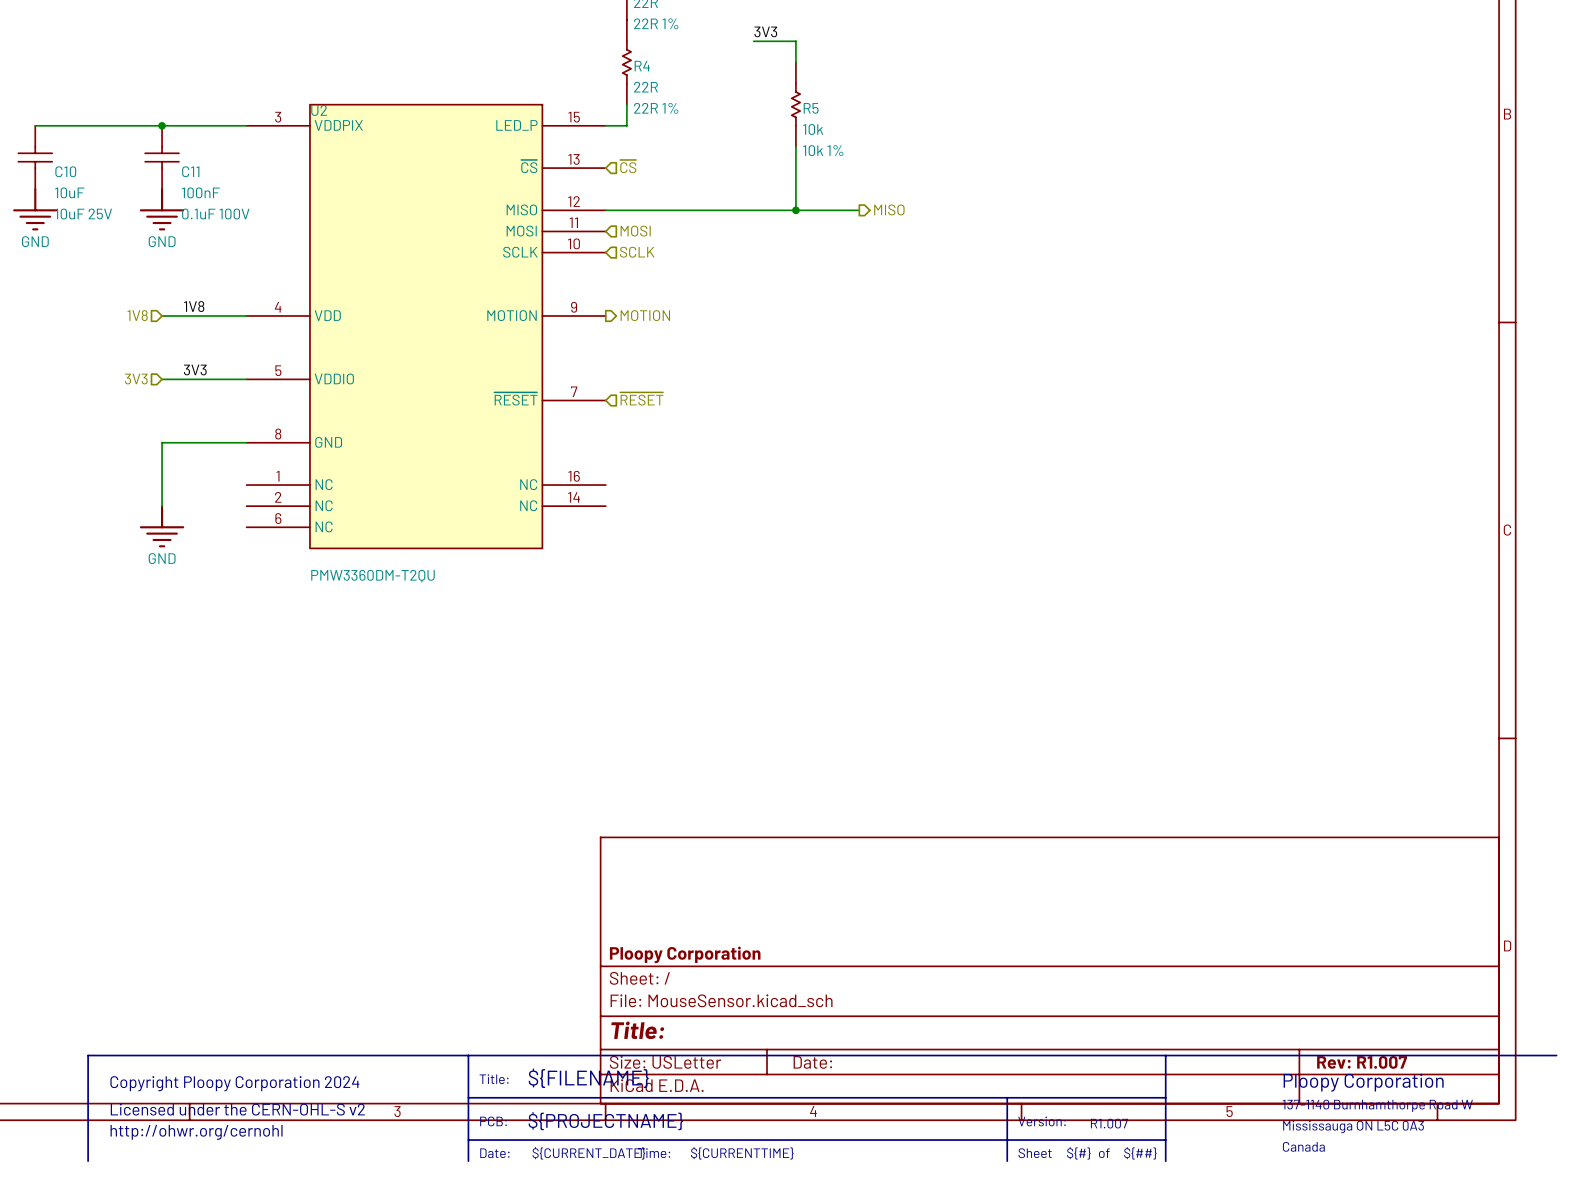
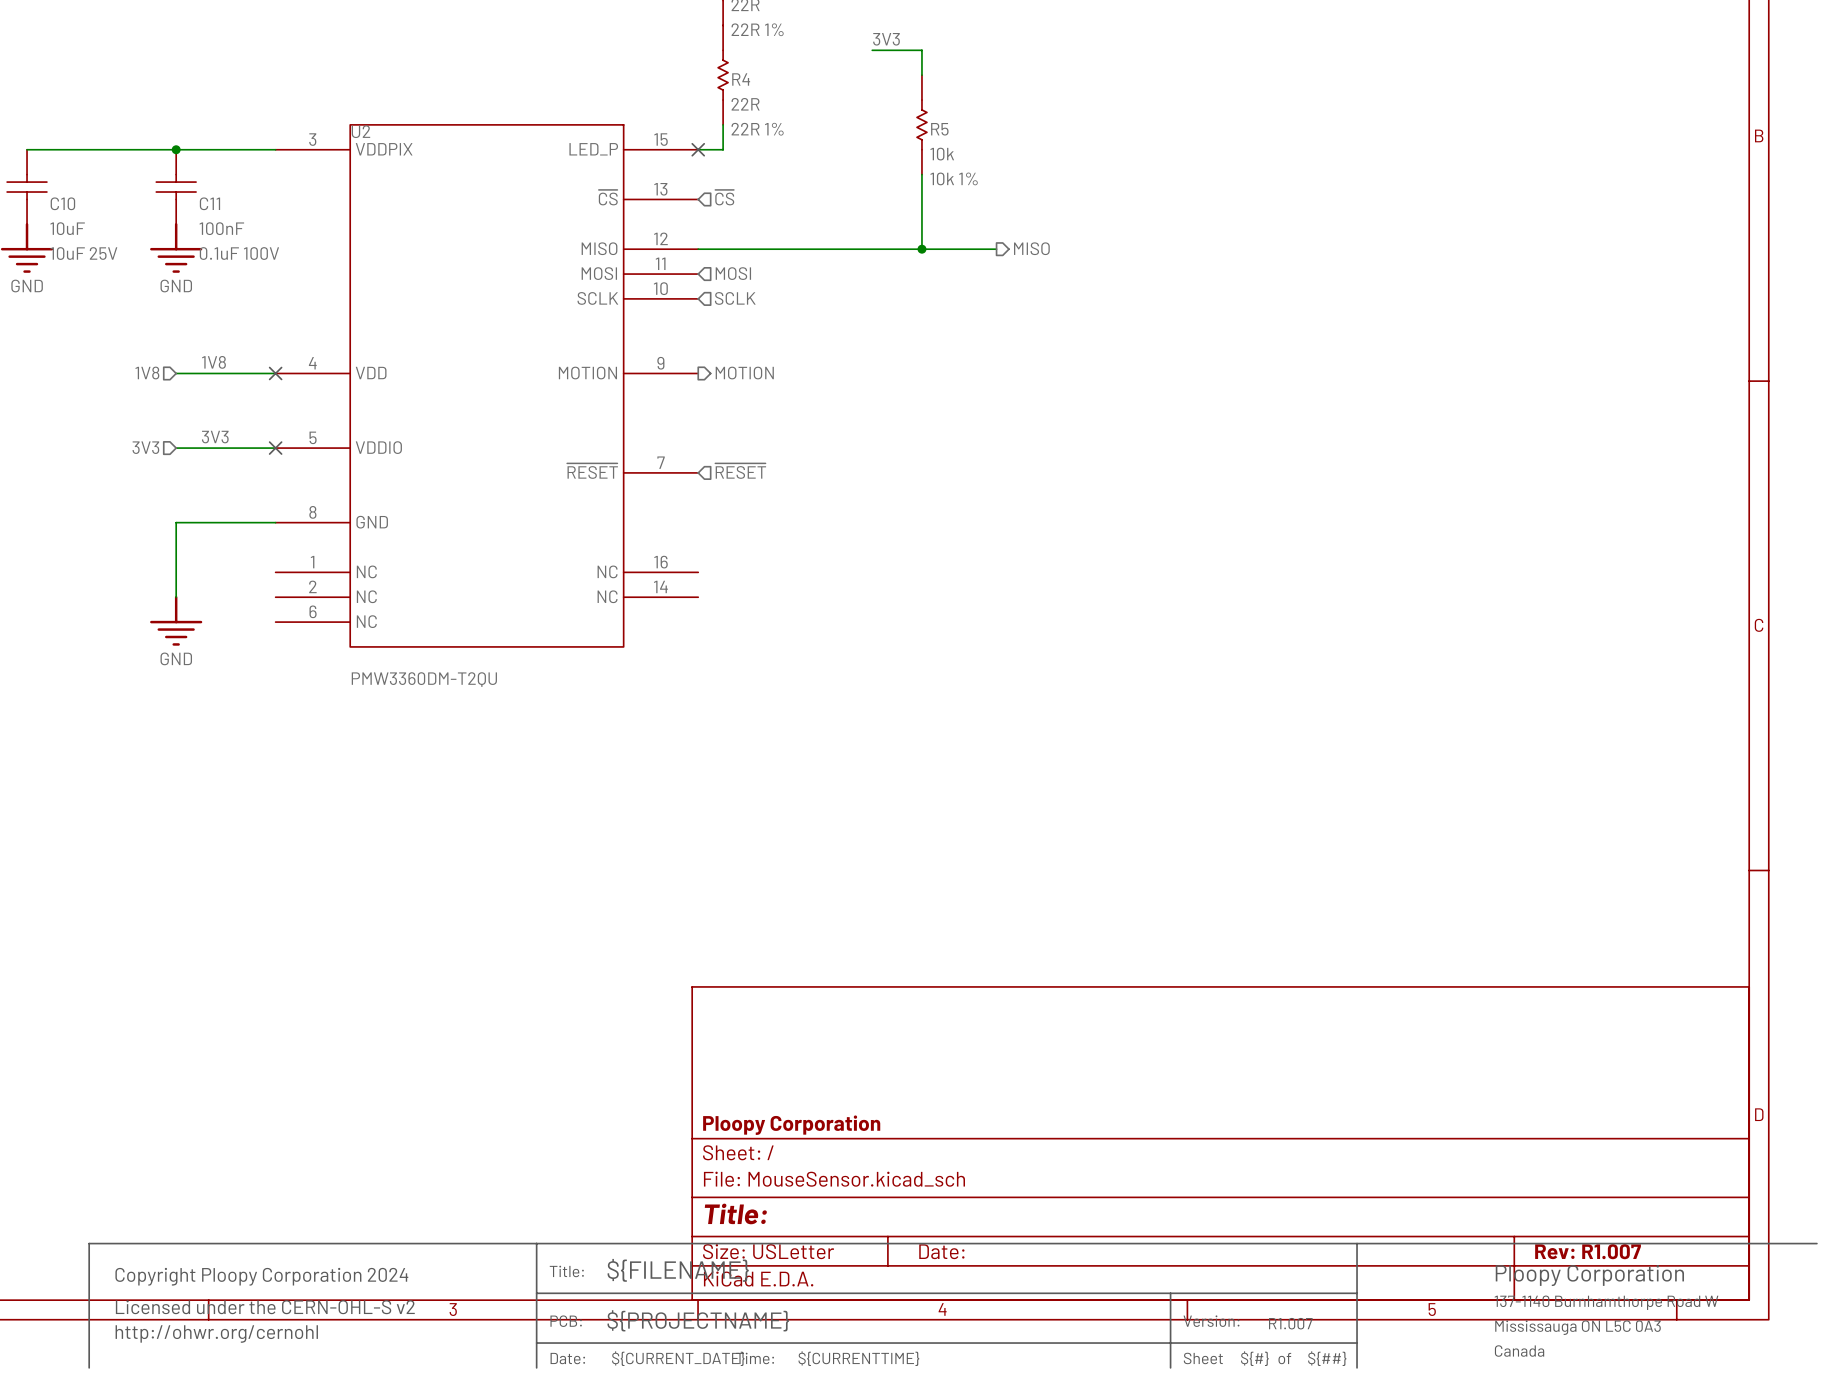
no-connect mark: none -> (698, 149)
no-connect mark: none -> (275, 373)
no-connect mark: none -> (275, 448)

